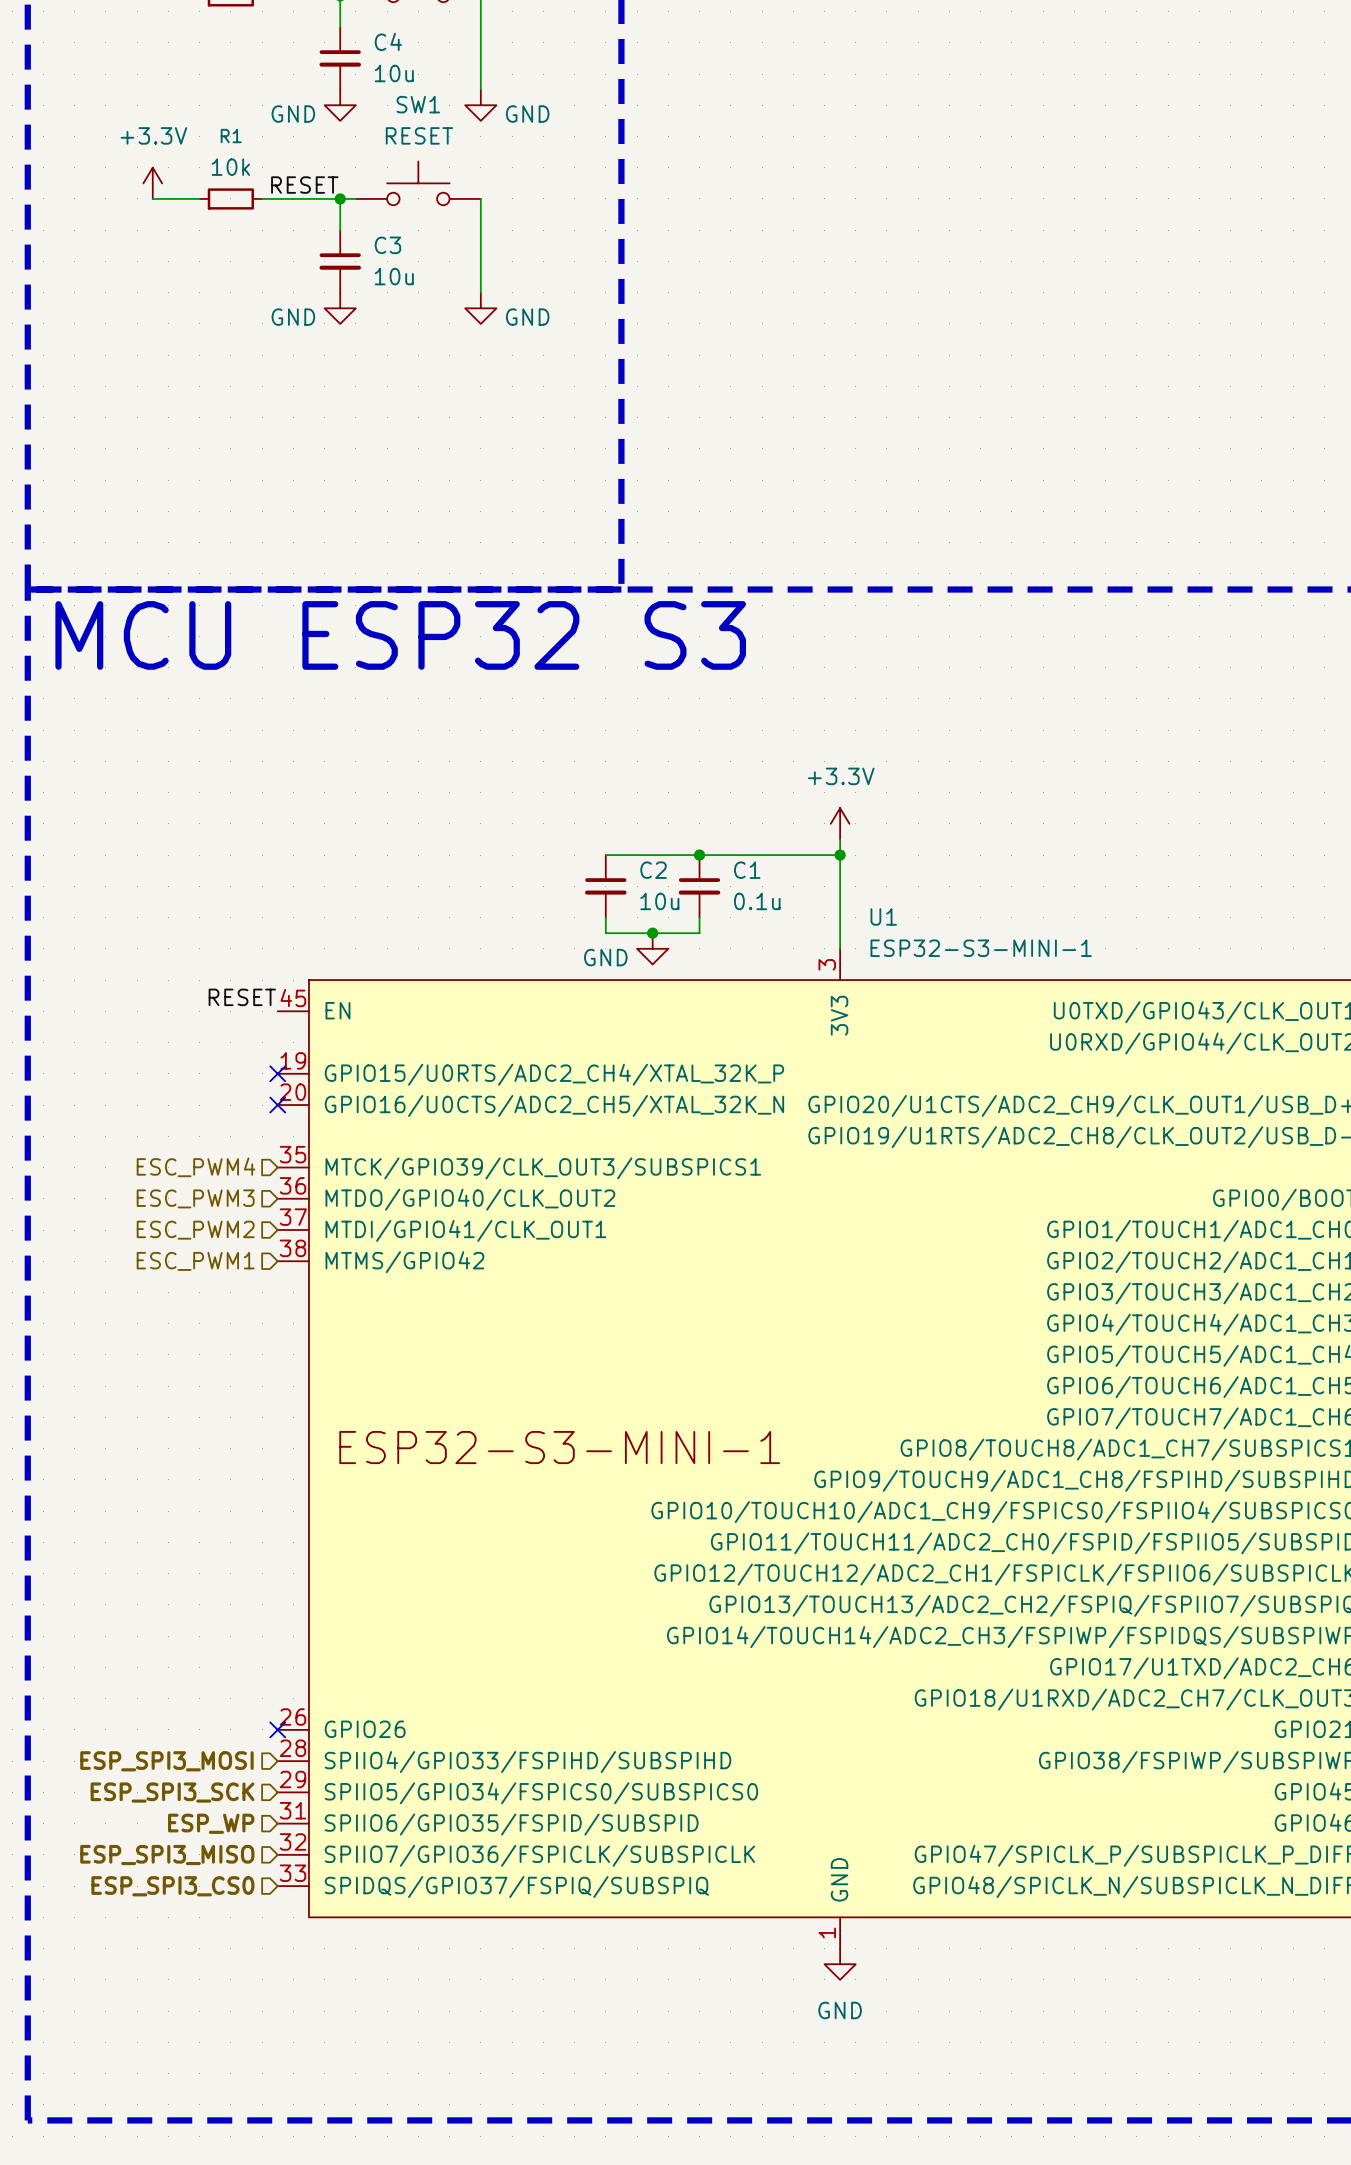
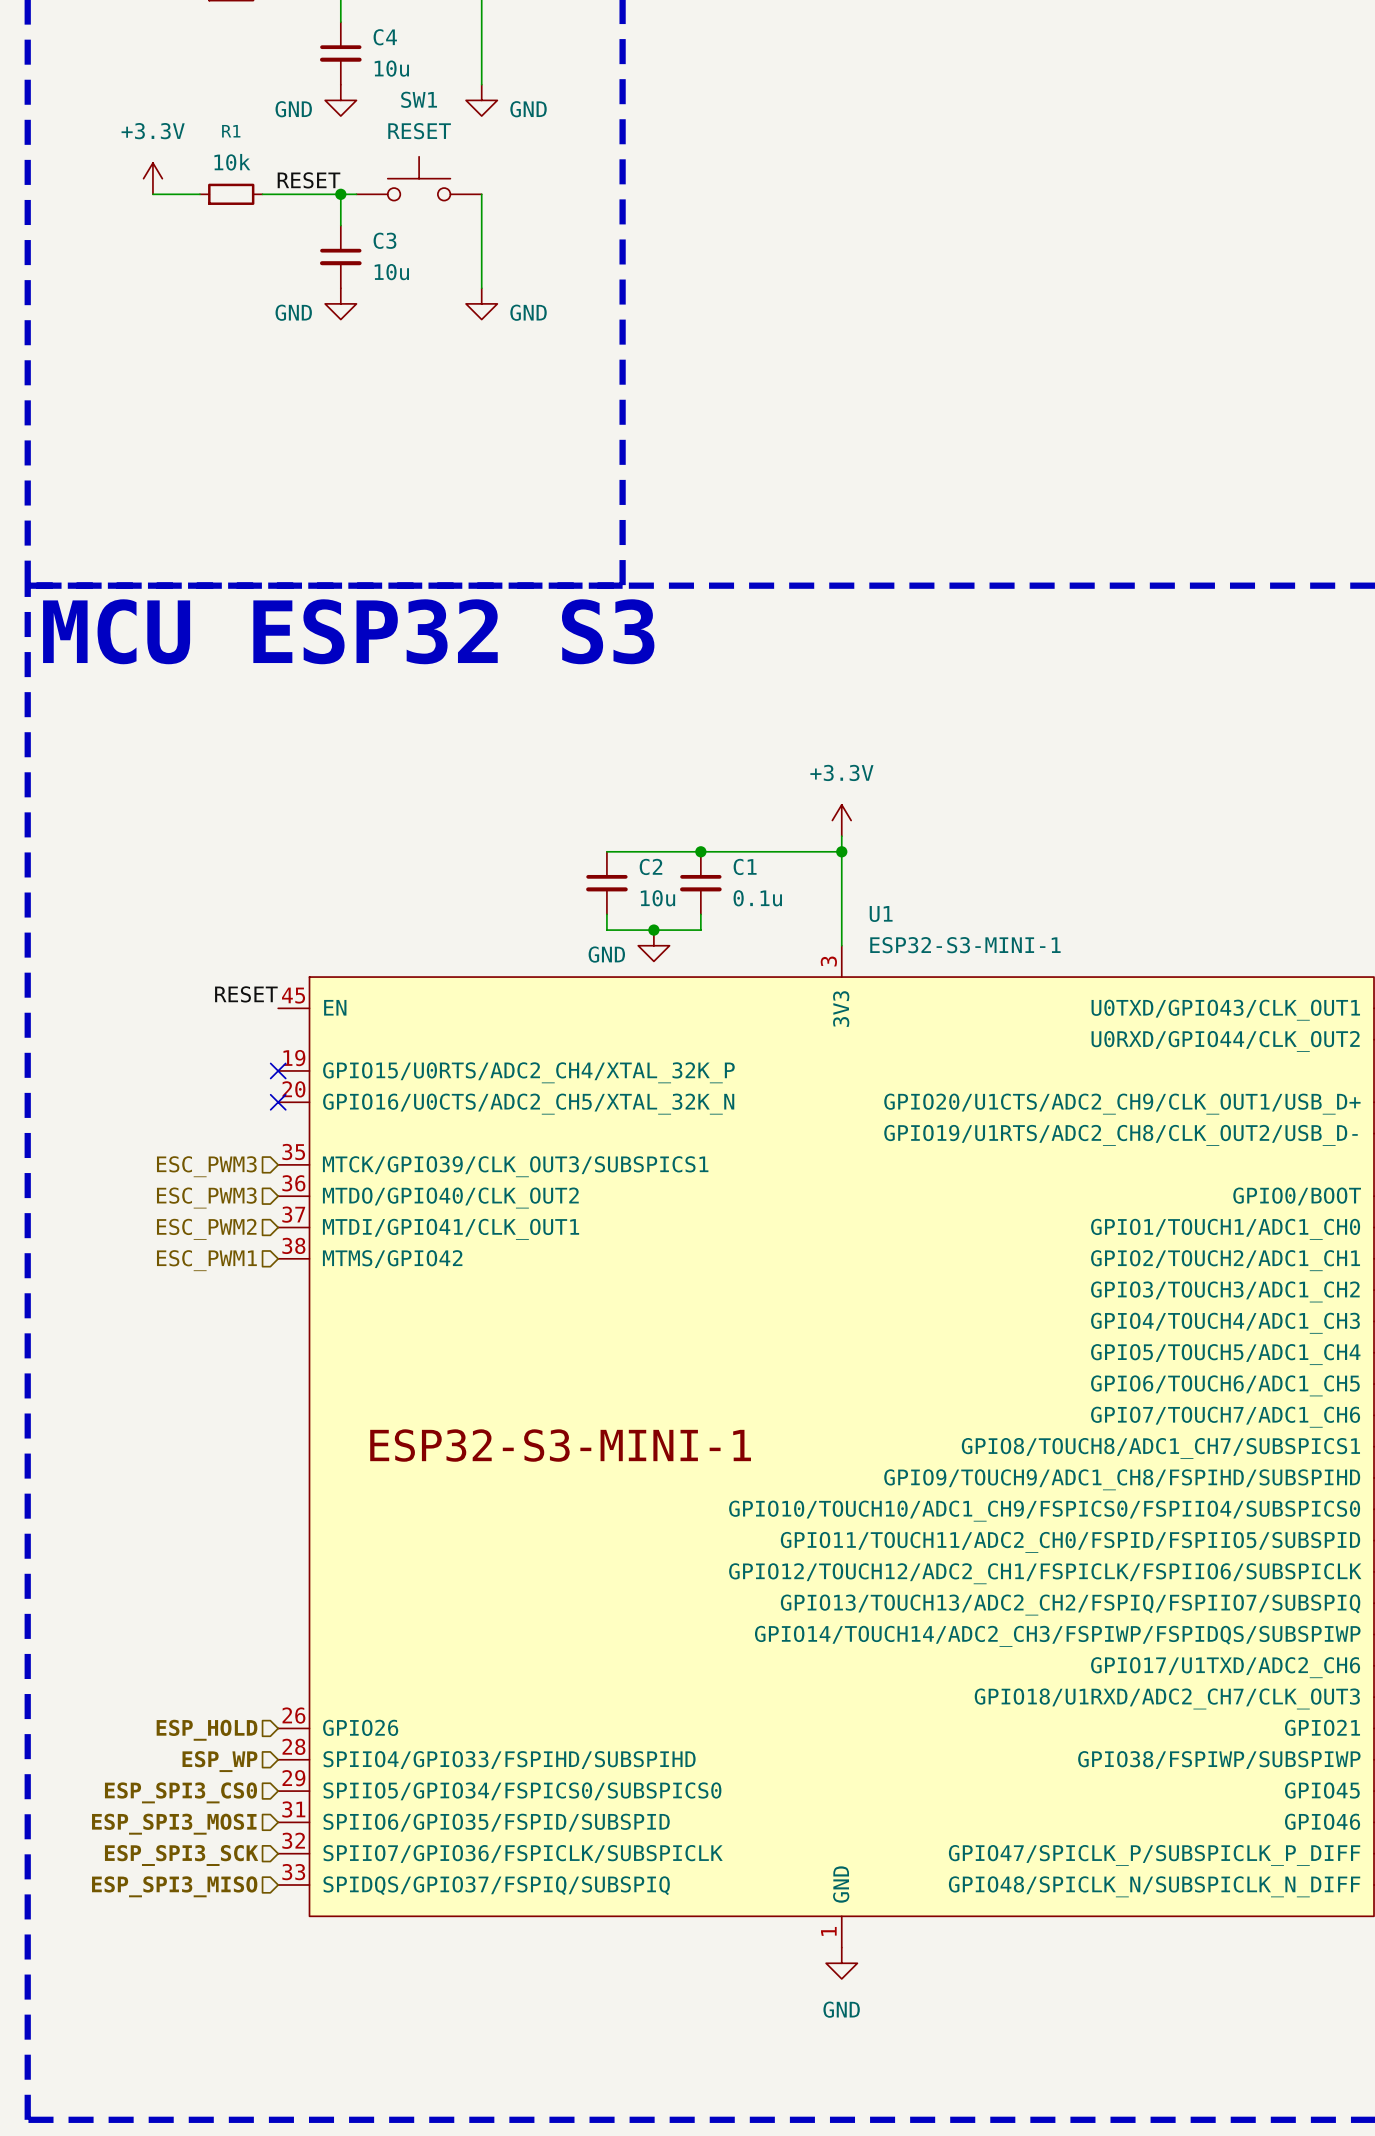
hierarchical label: ESC_PWM4 (196, 1167) -> ESC_PWM3 (206, 1166)
no-connect mark: (277, 1729) -> none
hierarchical label: none -> ESP_HOLD (207, 1730)
hierarchical label: ESP_SPI3_MOSI (166, 1761) -> ESP_WP (219, 1761)
hierarchical label: ESP_SPI3_SCK (172, 1792) -> ESP_SPI3_CS0 (180, 1792)
hierarchical label: ESP_WP (211, 1823) -> ESP_SPI3_MOSI (174, 1824)
hierarchical label: ESP_SPI3_MISO (167, 1855) -> ESP_SPI3_SCK (181, 1855)
hierarchical label: ESP_SPI3_CS0 (172, 1886) -> ESP_SPI3_MISO (174, 1886)

